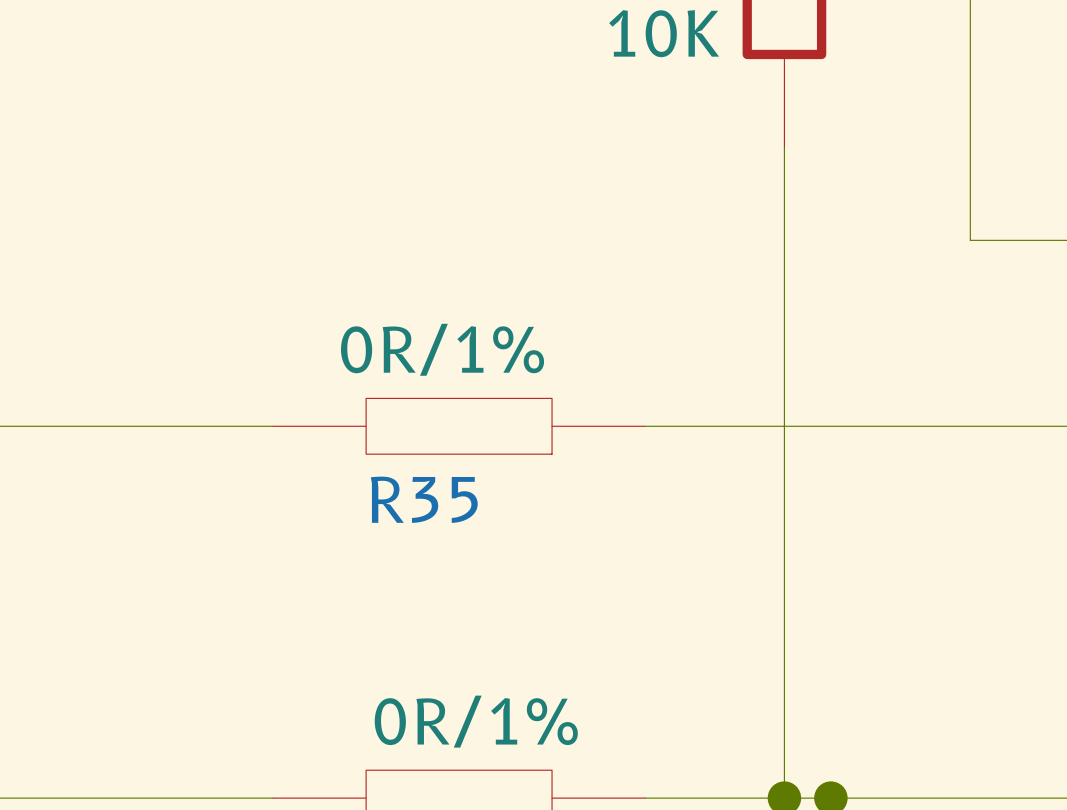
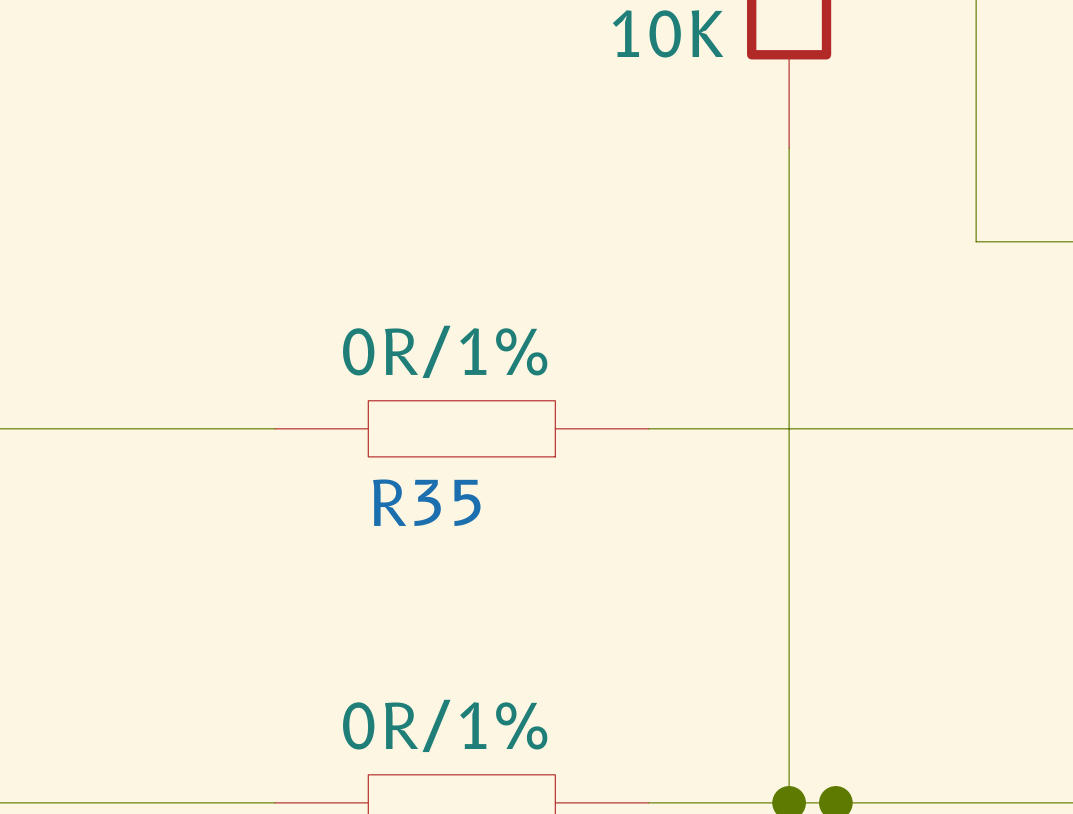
part value position: 0R/1% (476, 721) -> 0R/1% (445, 725)

